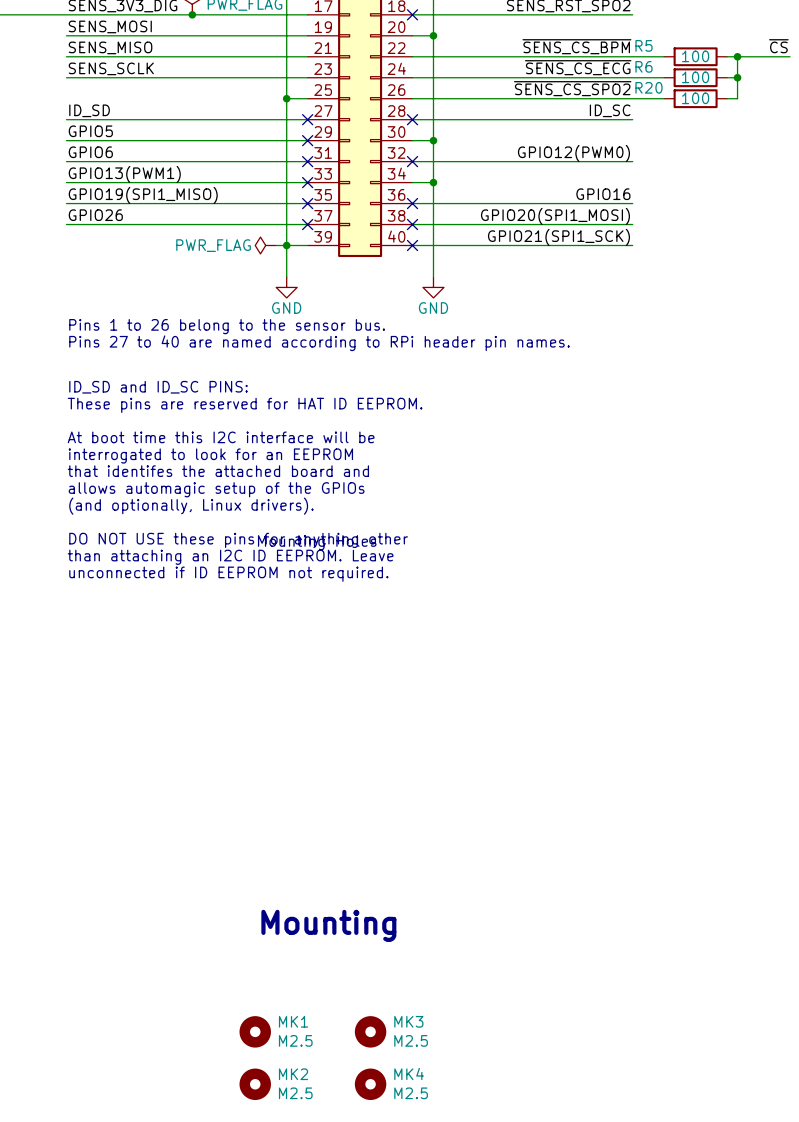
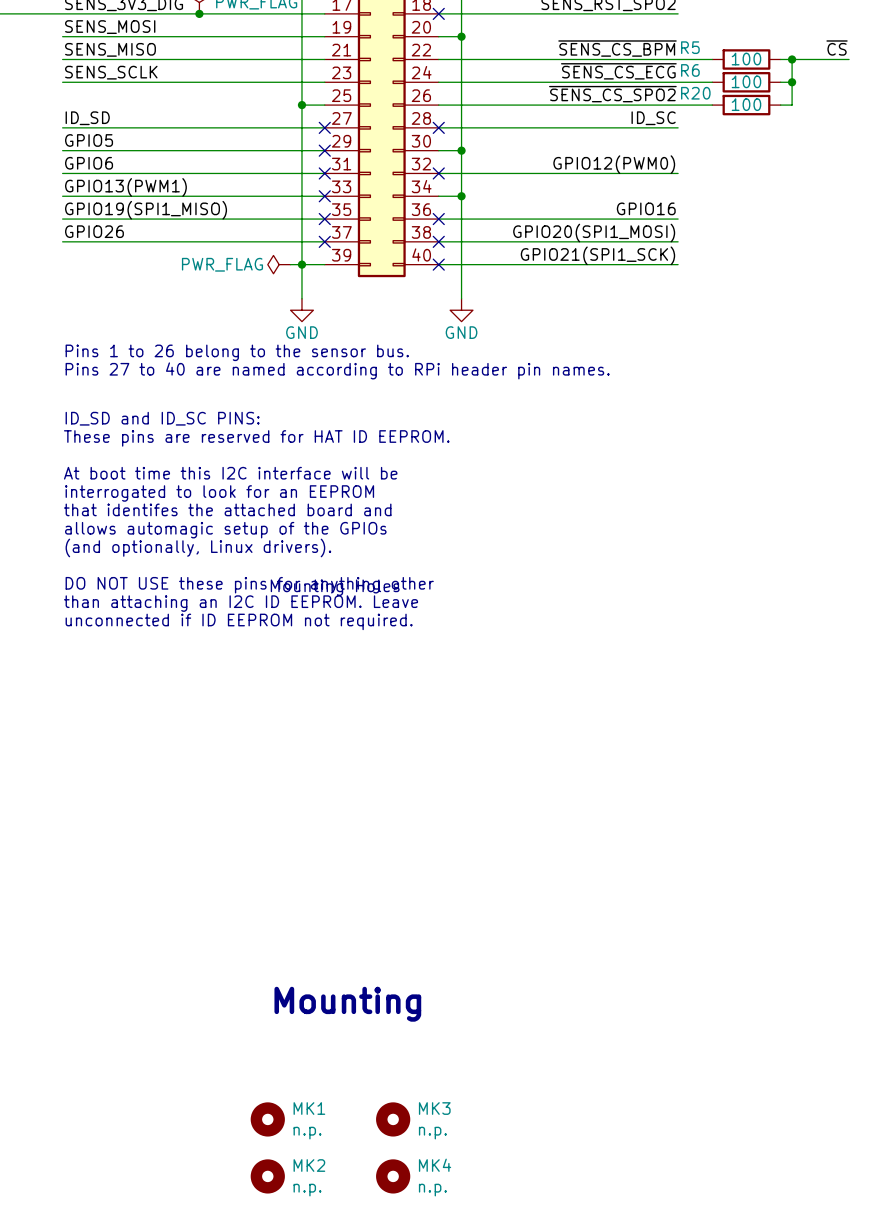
MK1 value: M2.5 (295, 1040) -> n.p. (307, 1133)
MK3 value: M2.5 (411, 1040) -> n.p. (432, 1133)
MK2 value: M2.5 (295, 1093) -> n.p. (307, 1190)
MK4 value: M2.5 (411, 1093) -> n.p. (432, 1190)

